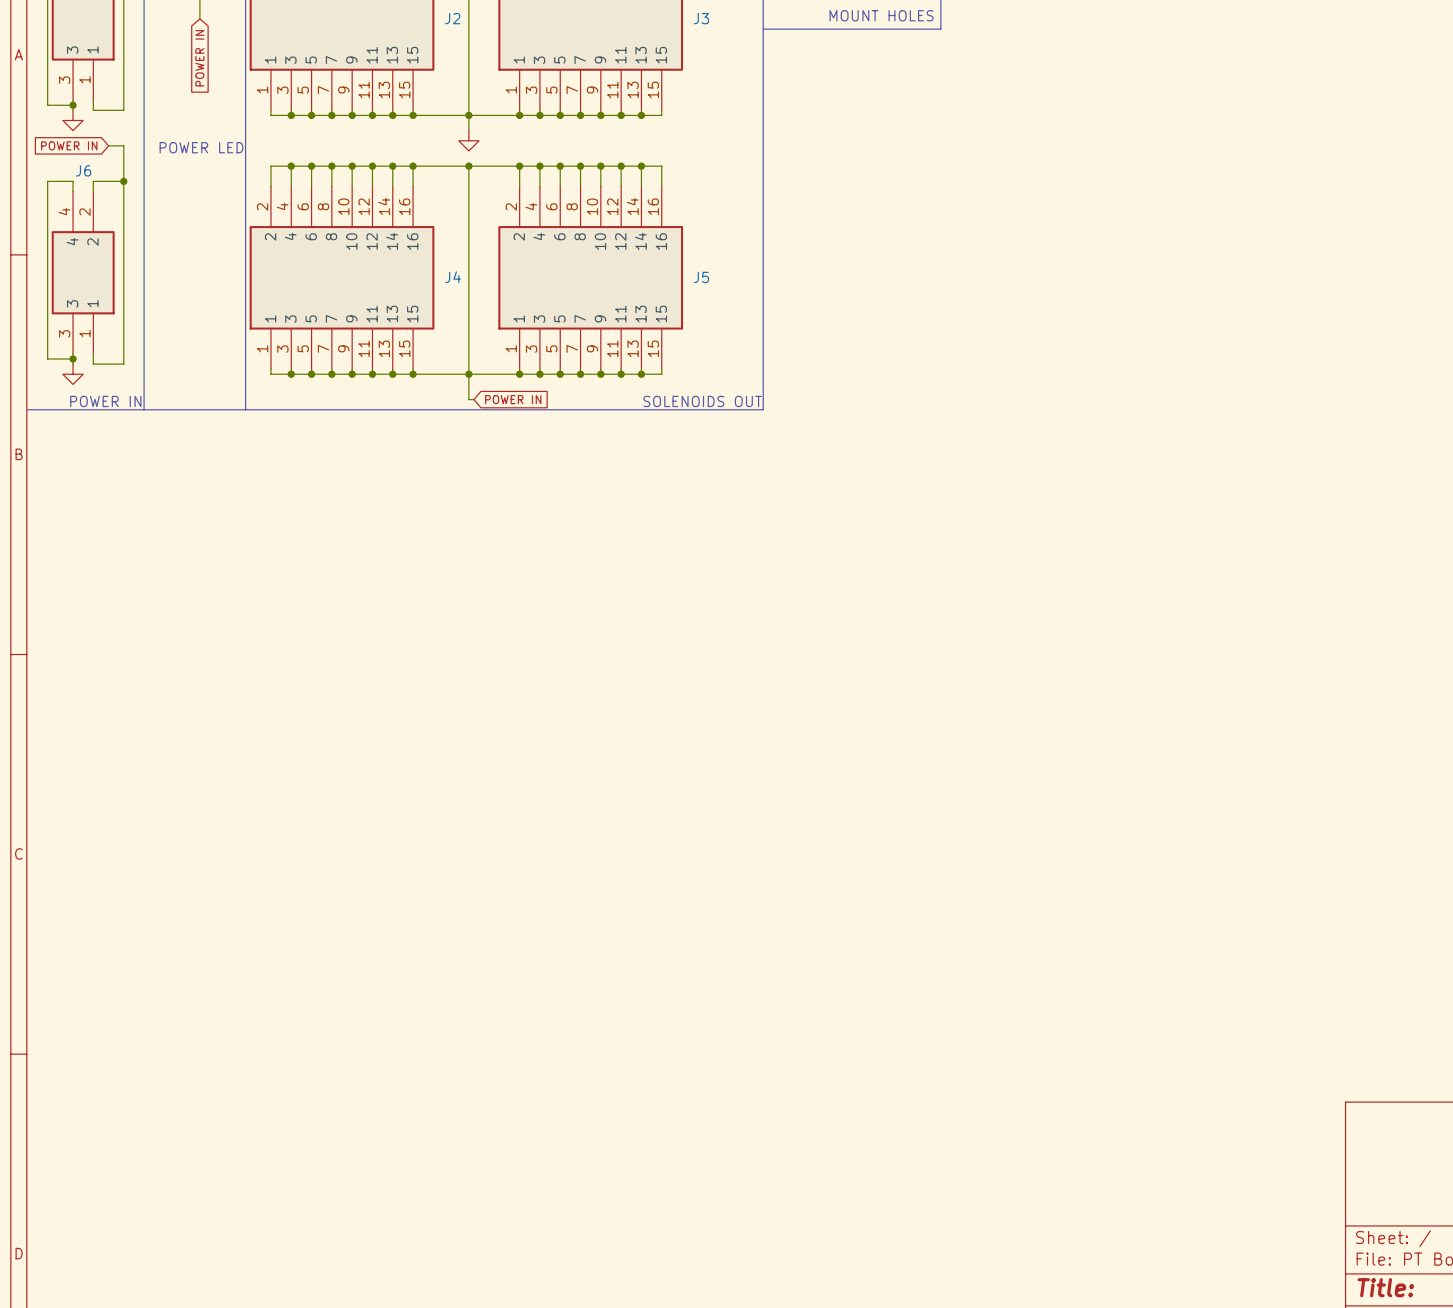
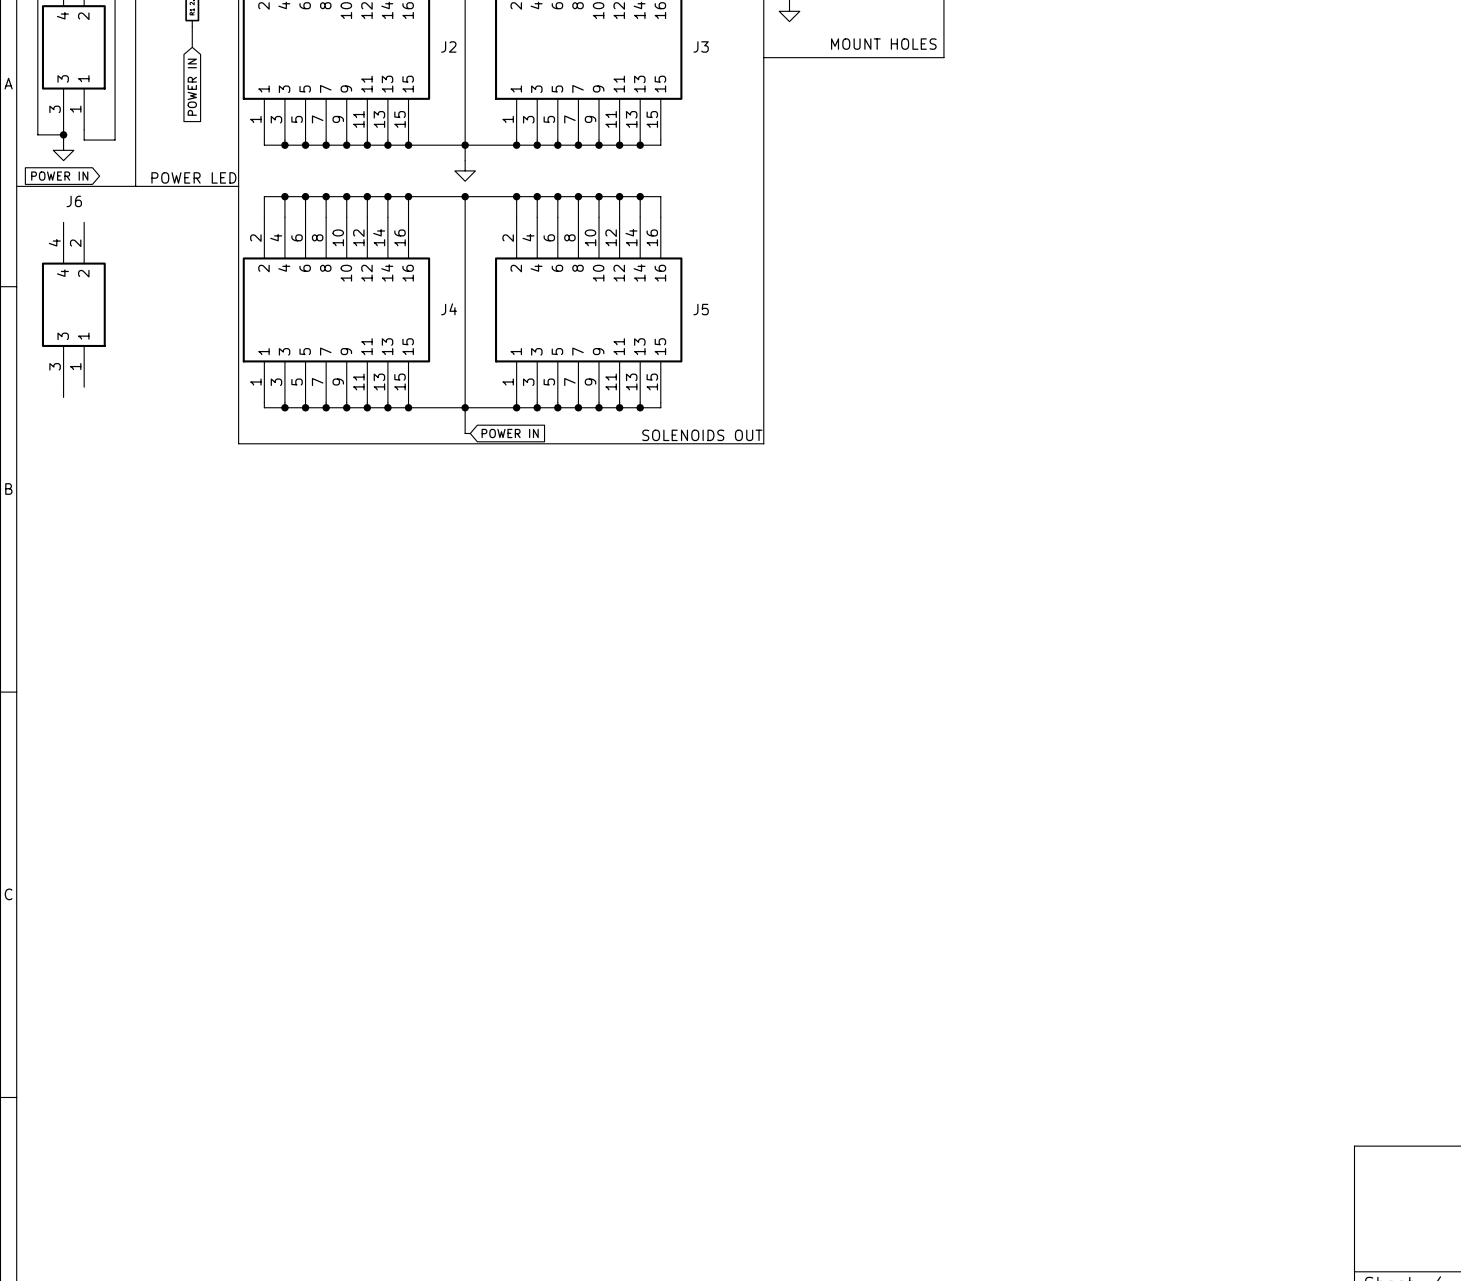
wire: (108, 145) (123, 145) (123, 364) (93, 364) (93, 353) -> none
line: none -> (17, 186) (238, 186)
line: (144, 156) (144, 409) -> none
wire: (123, 181) (93, 181) (93, 191) -> none
junction: (123, 181) -> none
wire: (73, 191) (73, 181) (47, 181) (47, 359) (73, 359) -> none
junction: (73, 359) -> none
power symbol: (73, 374) -> none
text: POWER IN (105, 401) -> none
line: (27, 409) (245, 409) -> none

